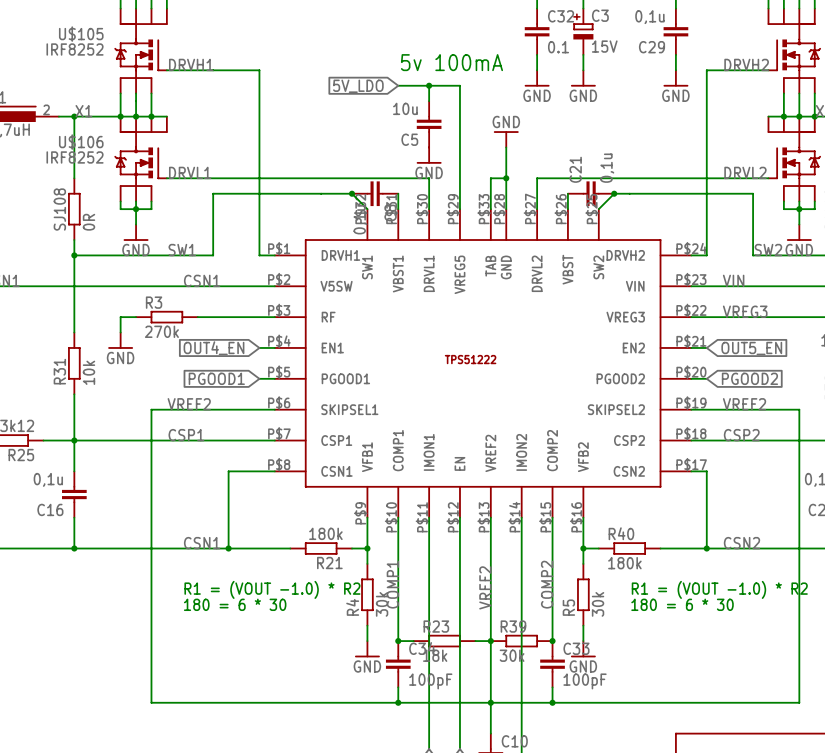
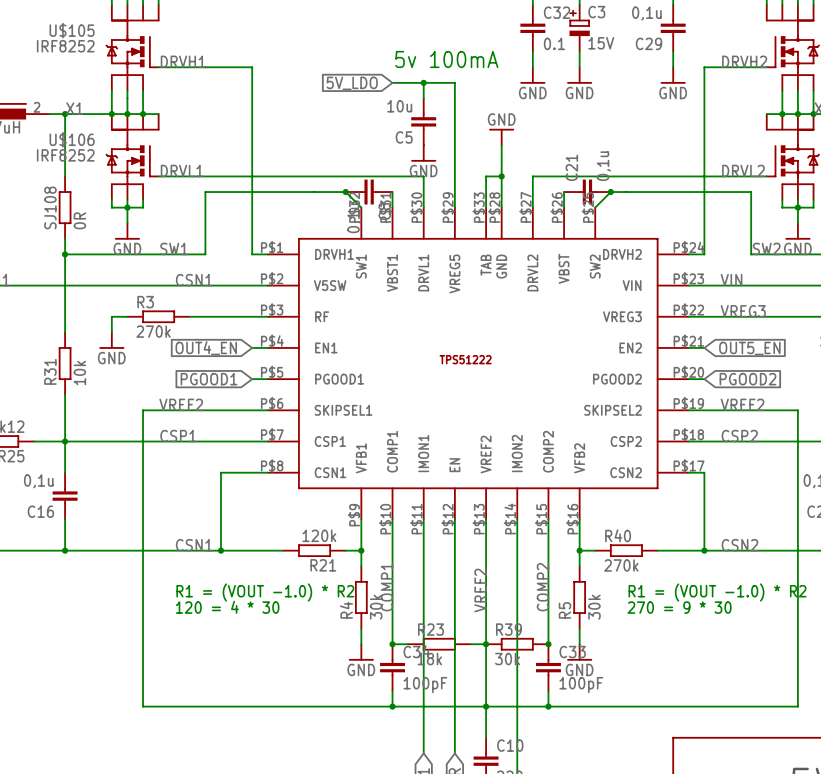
R21 value: 180k (325, 533) -> 120k (319, 535)
R40 value: 180k (624, 563) -> 270k (621, 565)
text: 180 = 6 * 30 (235, 604) -> 120 = 4 * 30 (227, 607)
text: 180 = 6 * 30 (682, 604) -> 270 = 9 * 30 (679, 607)

